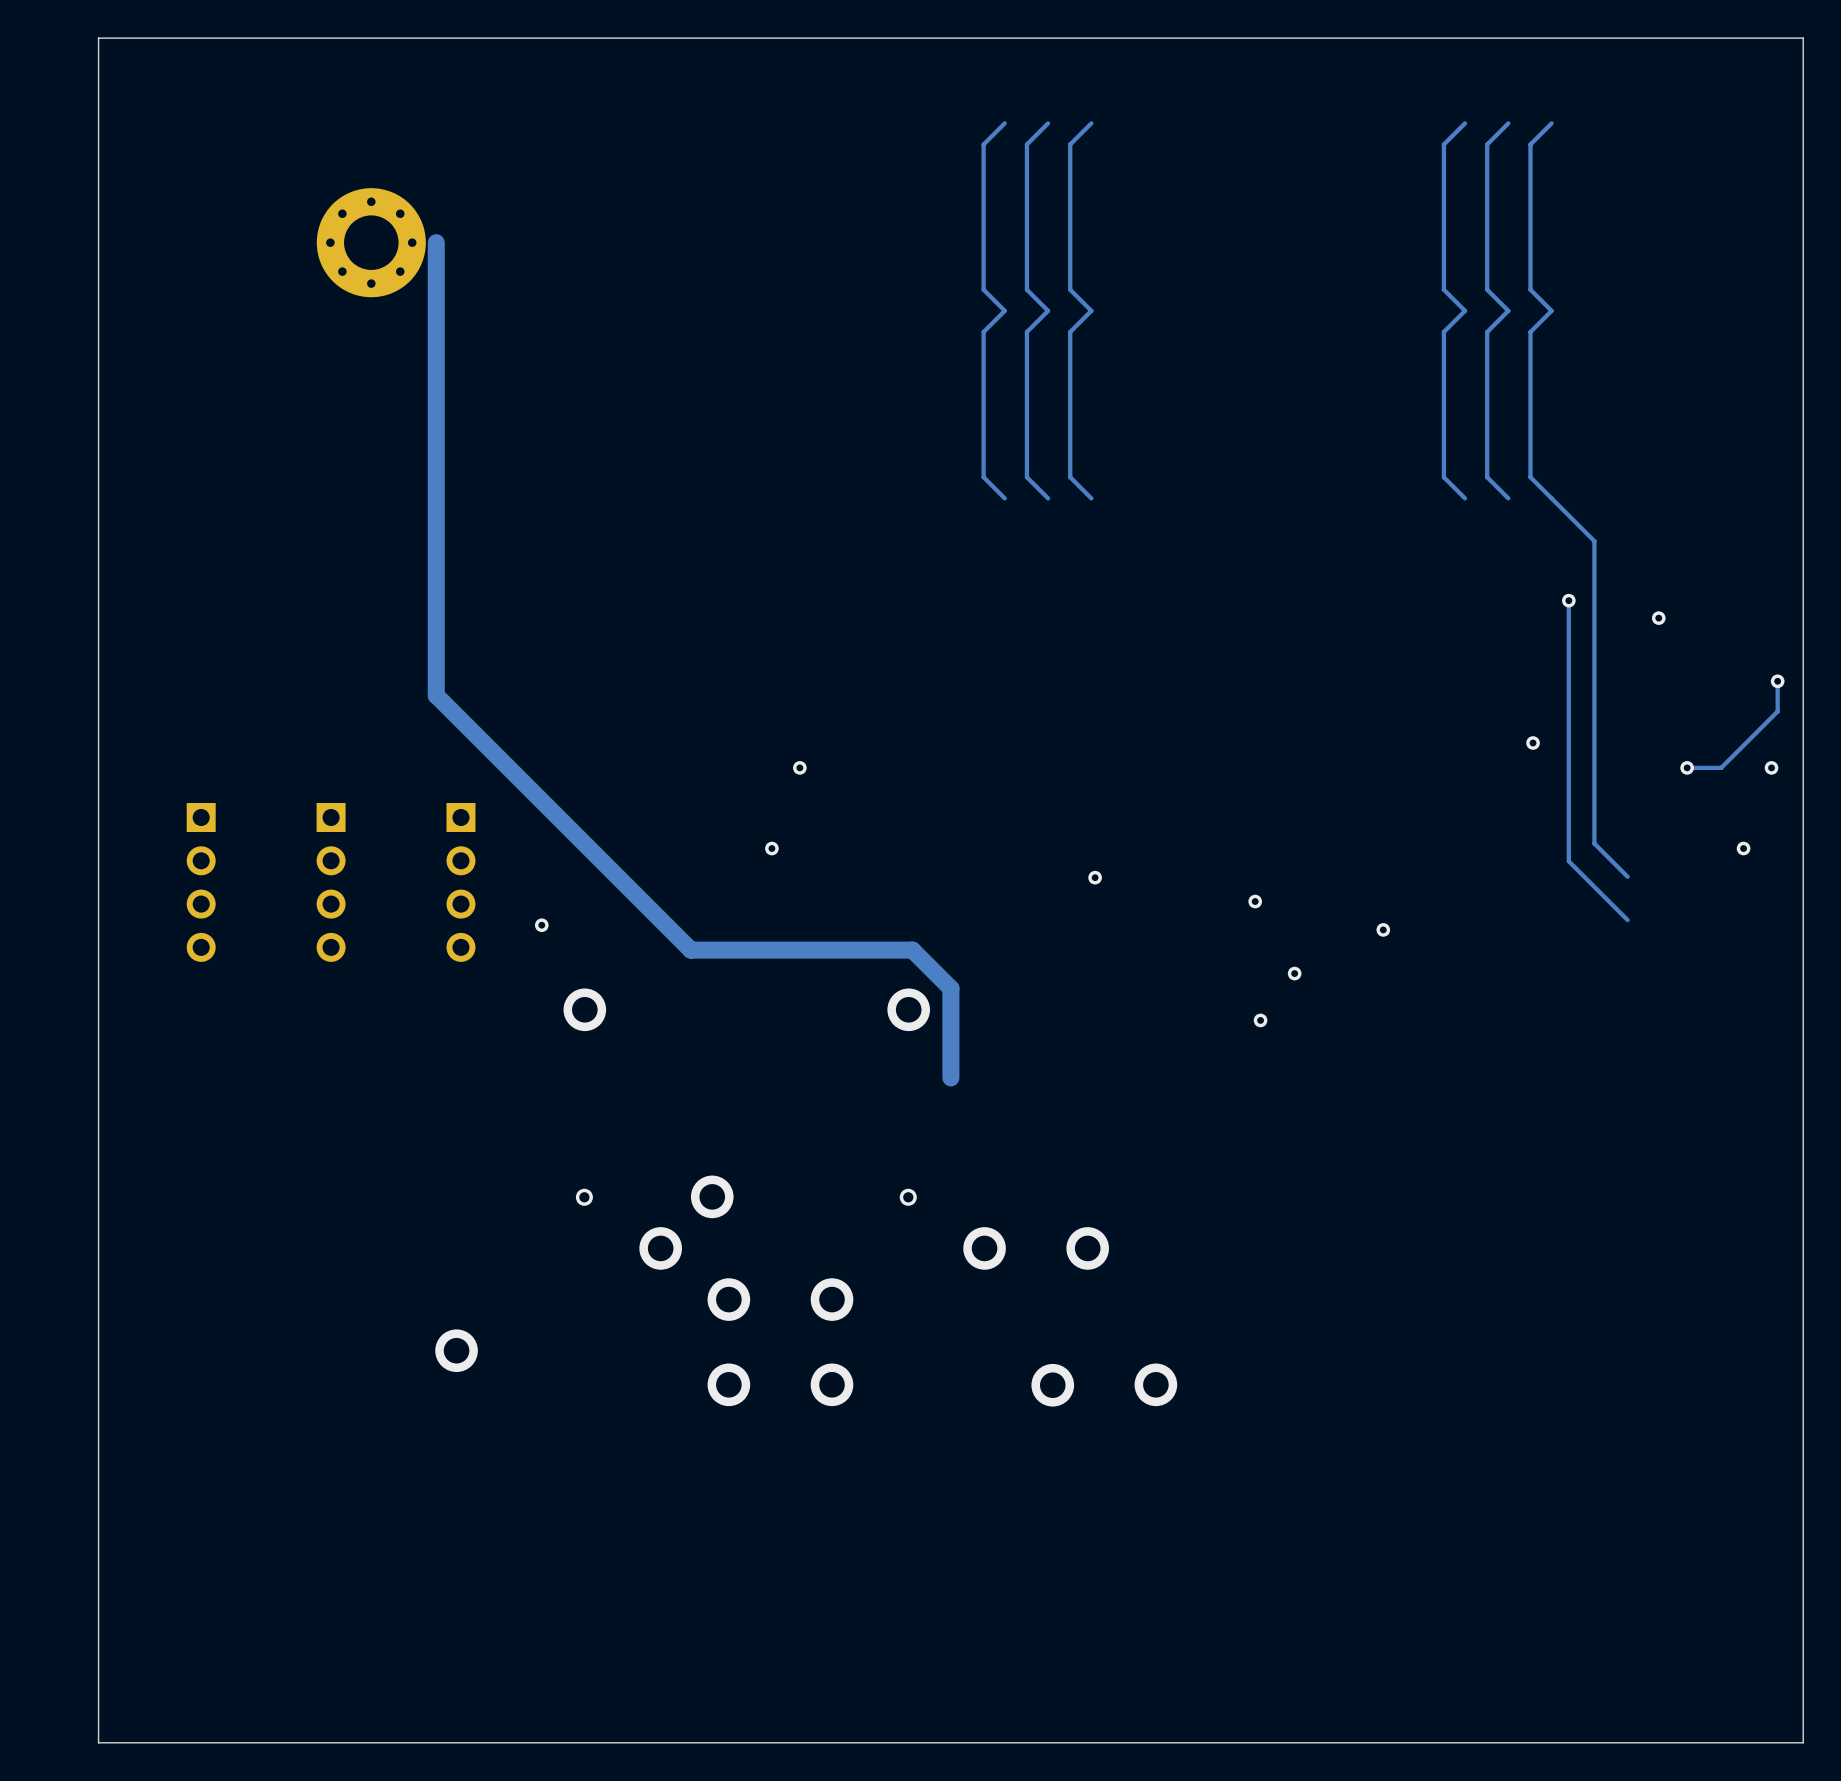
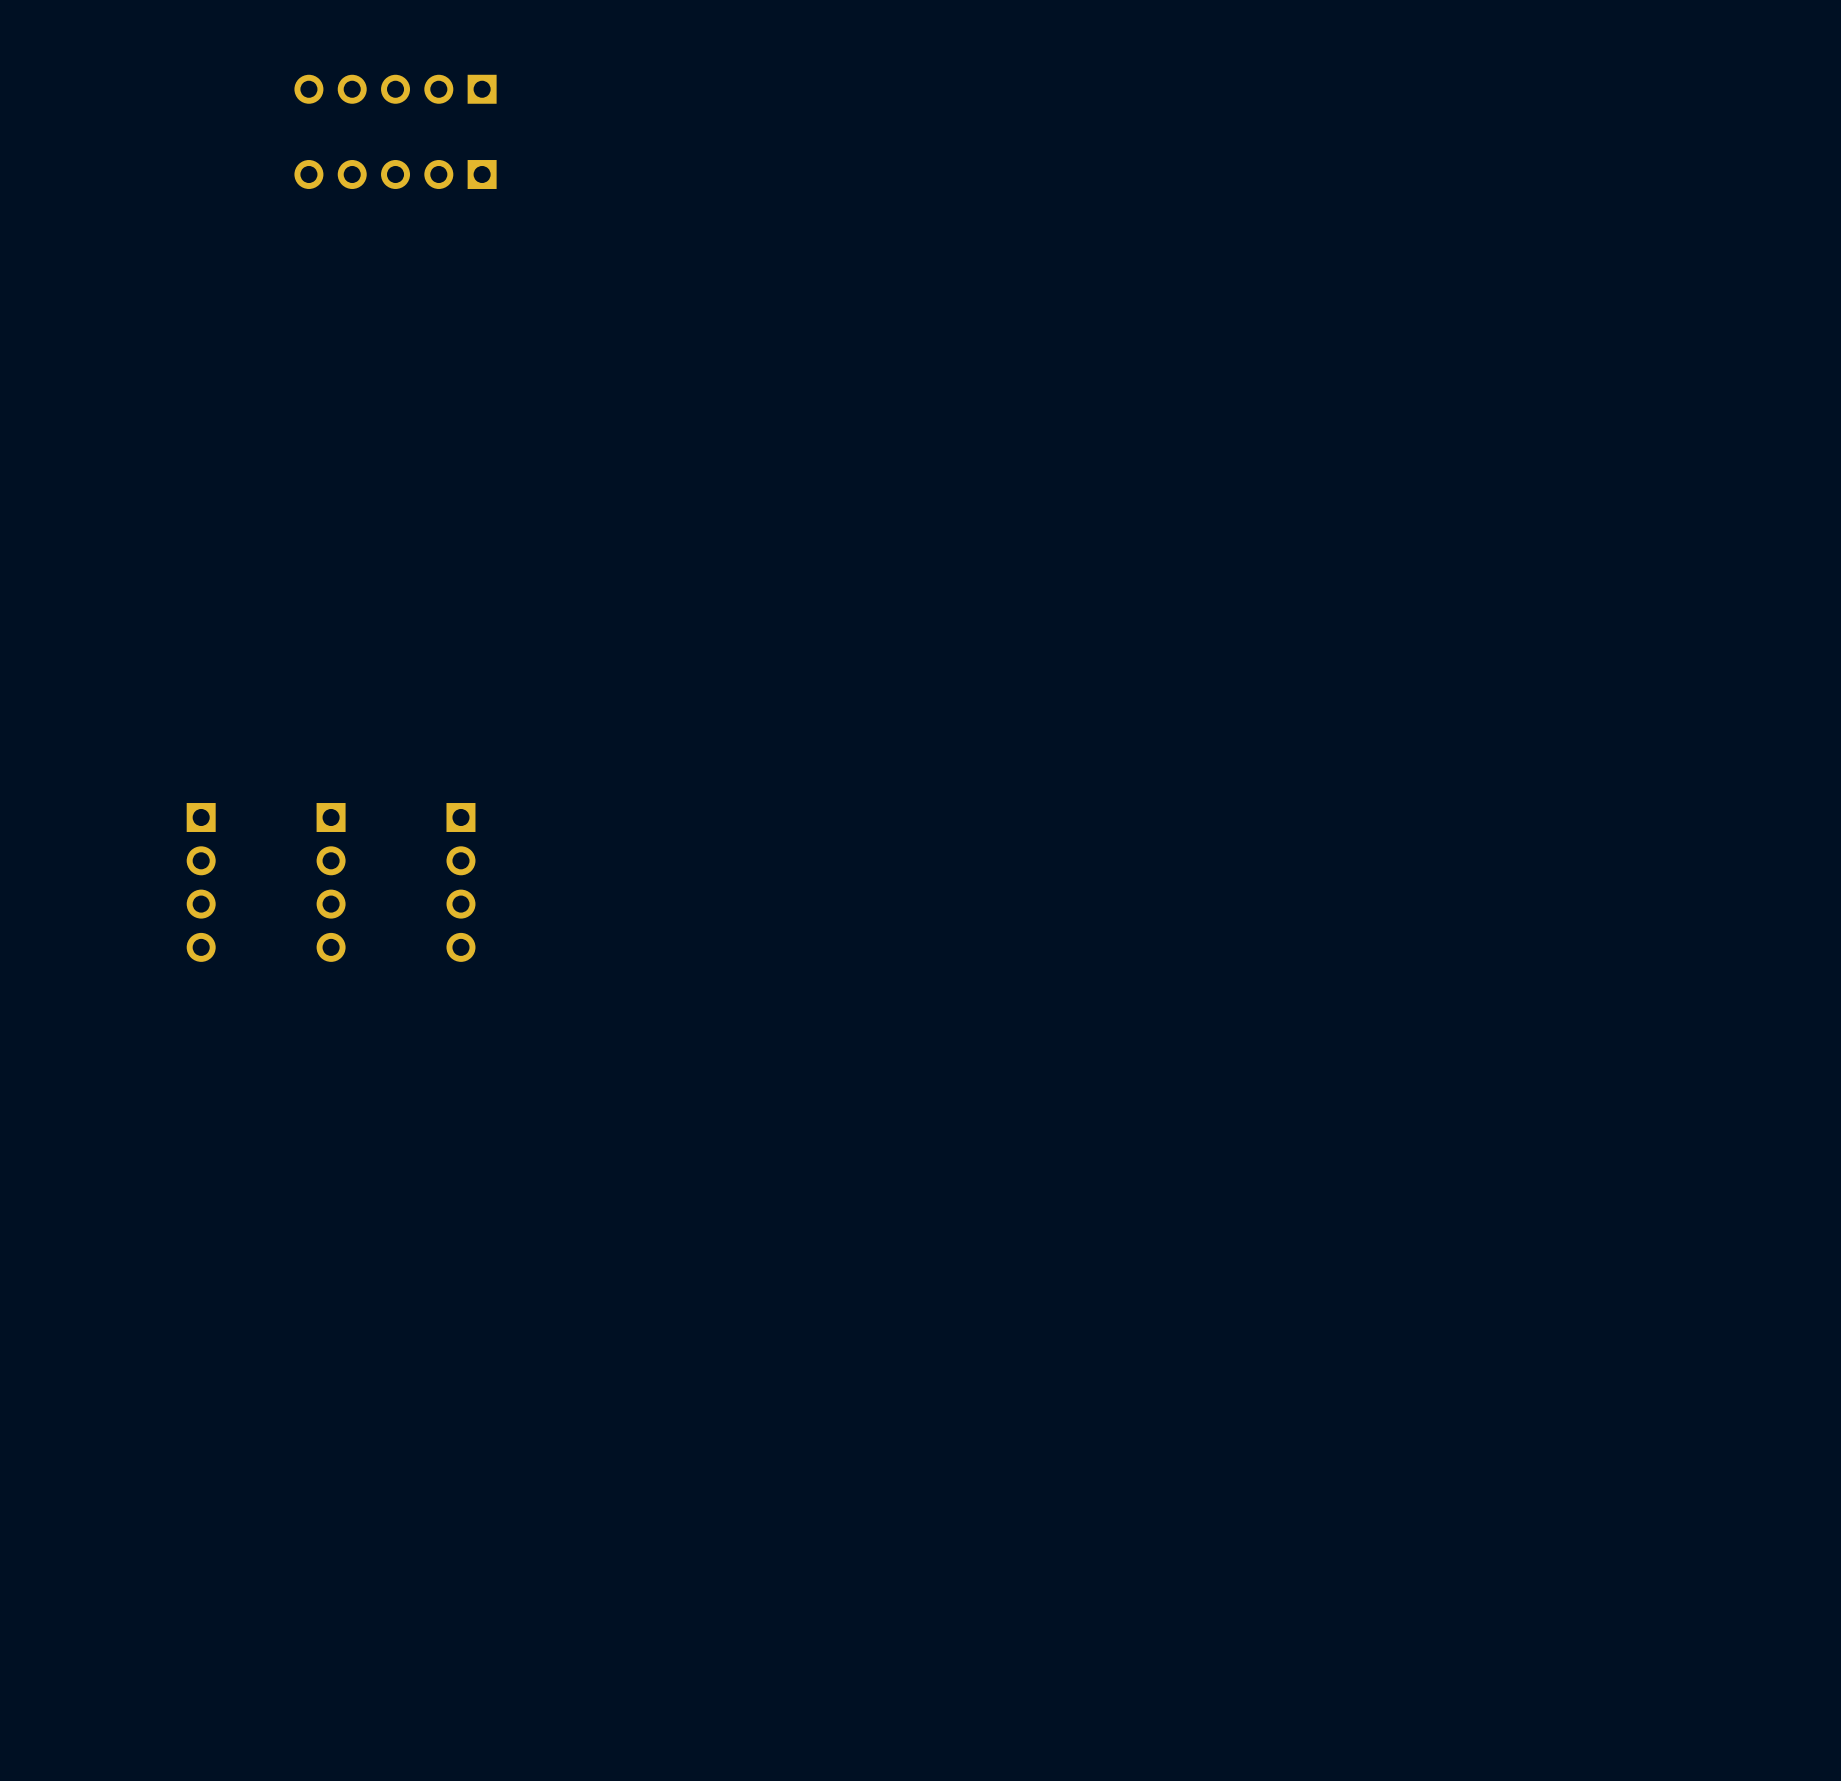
board edge: (1803, 38) (98, 38) (98, 1742) (1803, 1742) (1803, 38) -> none
part: none -> (395, 89)
track: (1004, 123) (983, 144) (983, 289) (1004, 310) (983, 332) (983, 477) (1004, 498) -> none
track: (1048, 123) (1026, 144) (1026, 289) (1048, 310) (1026, 332) (1026, 477) (1048, 498) -> none
track: (1091, 123) (1070, 144) (1070, 289) (1091, 310) (1070, 332) (1070, 477) (1091, 498) -> none
track: (1465, 123) (1443, 144) (1443, 289) (1465, 310) (1443, 332) (1443, 477) (1465, 498) -> none
track: (1508, 123) (1487, 144) (1487, 289) (1508, 310) (1487, 332) (1487, 477) (1508, 498) -> none
track: (1551, 123) (1530, 144) (1530, 289) (1551, 310) (1530, 332) (1530, 477) (1594, 541) (1594, 843) (1627, 876) -> none
part: none -> (395, 174)
part: (371, 242) -> none
track: (436, 242) (436, 695) (690, 950) (912, 950) (950, 988) (950, 1077) -> none
track: (1568, 600) (1568, 861) (1627, 920) -> none
via: (1568, 600) -> none
via: (1658, 618) -> none
track: (1777, 681) (1777, 711) (1721, 767) (1687, 767) -> none
via: (1777, 681) -> none
via: (1533, 743) -> none
via: (799, 767) -> none
via: (1687, 767) -> none
via: (1771, 767) -> none
via: (771, 848) -> none
via: (1743, 848) -> none
via: (1095, 877) -> none
via: (1255, 901) -> none
via: (541, 925) -> none
via: (1383, 929) -> none
via: (1294, 973) -> none
via: (584, 1009) -> none
via: (908, 1009) -> none
via: (1260, 1020) -> none
via: (712, 1196) -> none
via: (584, 1197) -> none
via: (908, 1197) -> none
via: (660, 1248) -> none
via: (984, 1248) -> none
via: (1087, 1248) -> none
via: (728, 1299) -> none
via: (832, 1299) -> none
via: (456, 1350) -> none
via: (728, 1384) -> none
via: (832, 1384) -> none
via: (1155, 1384) -> none
via: (1052, 1385) -> none

